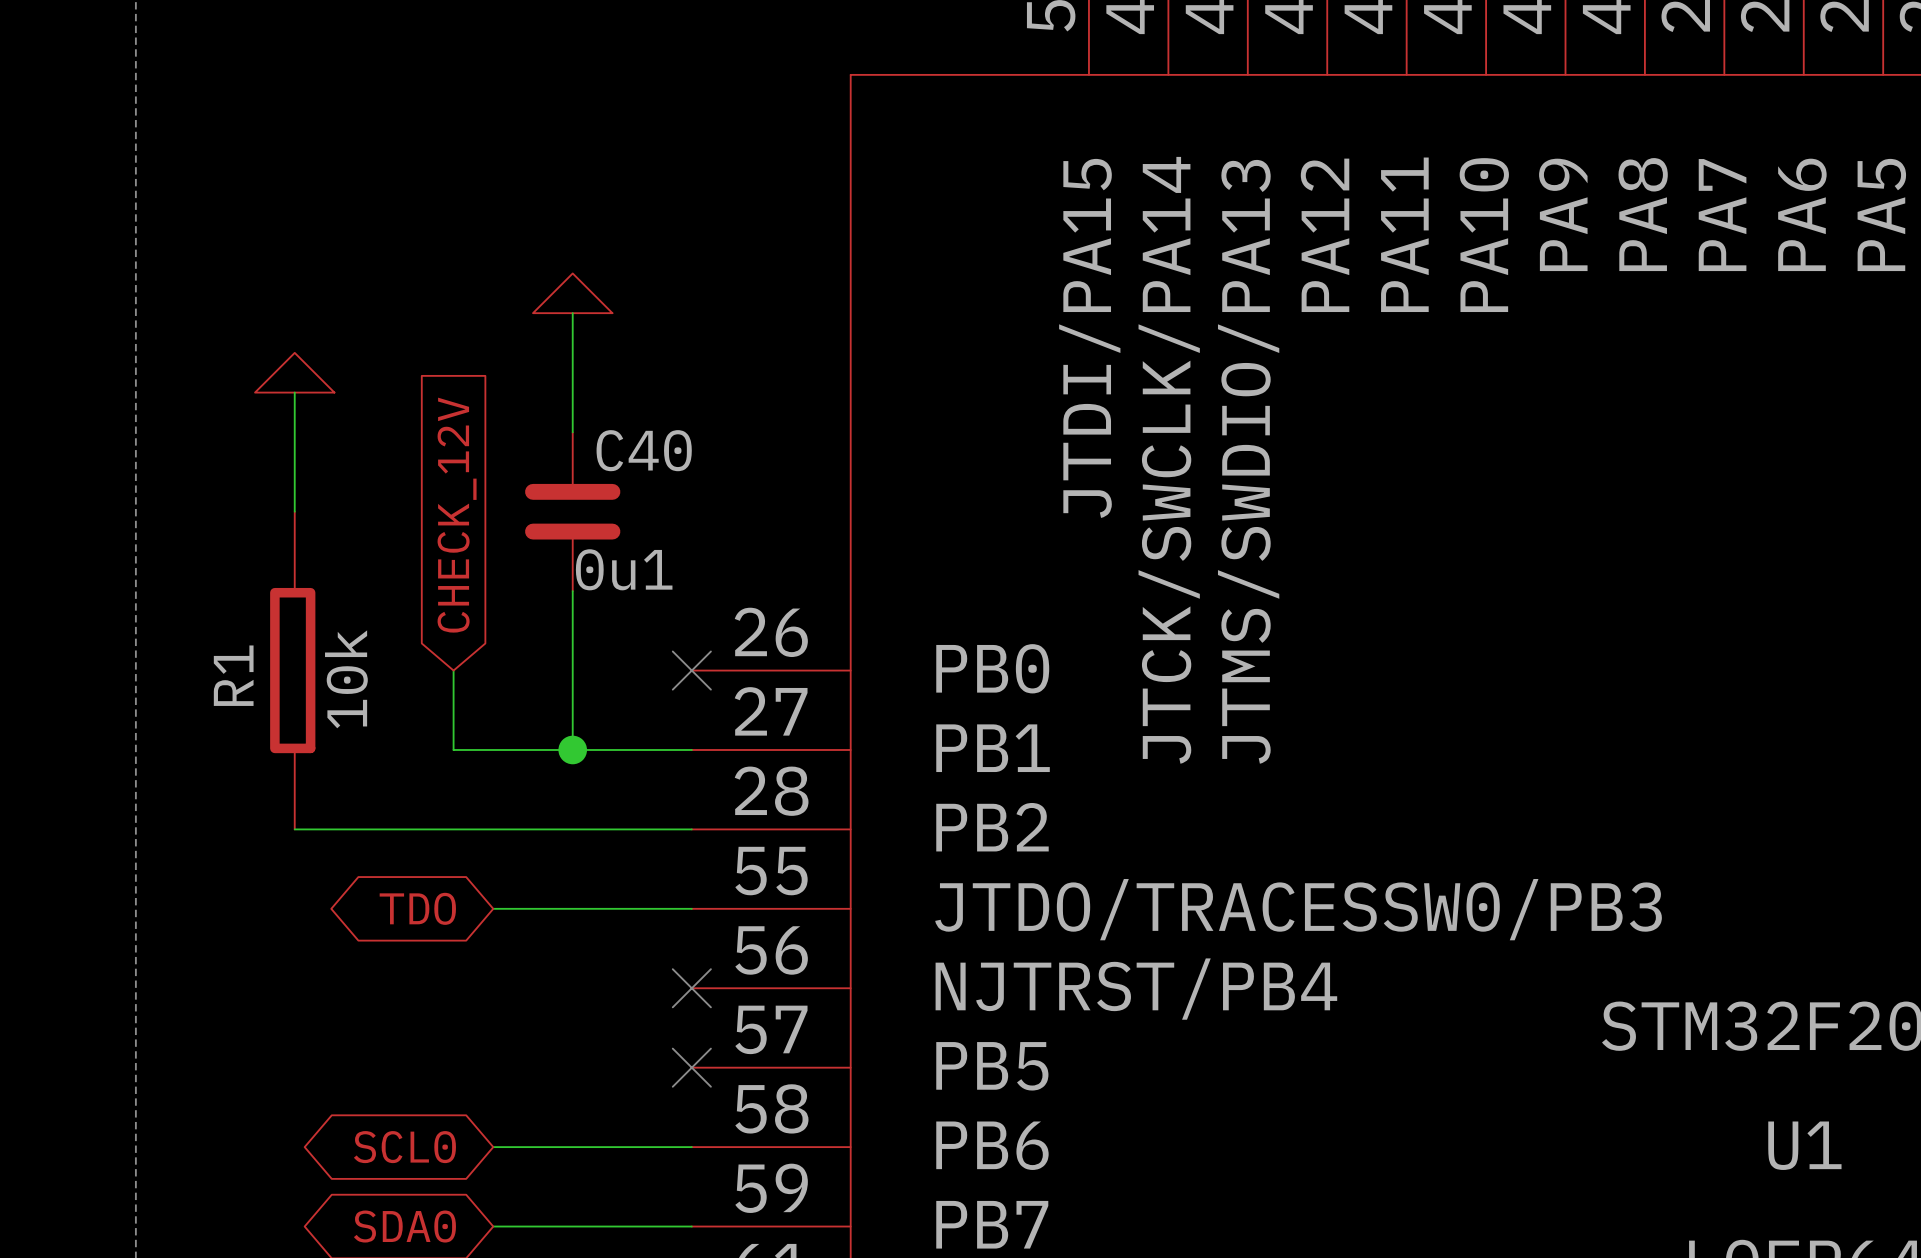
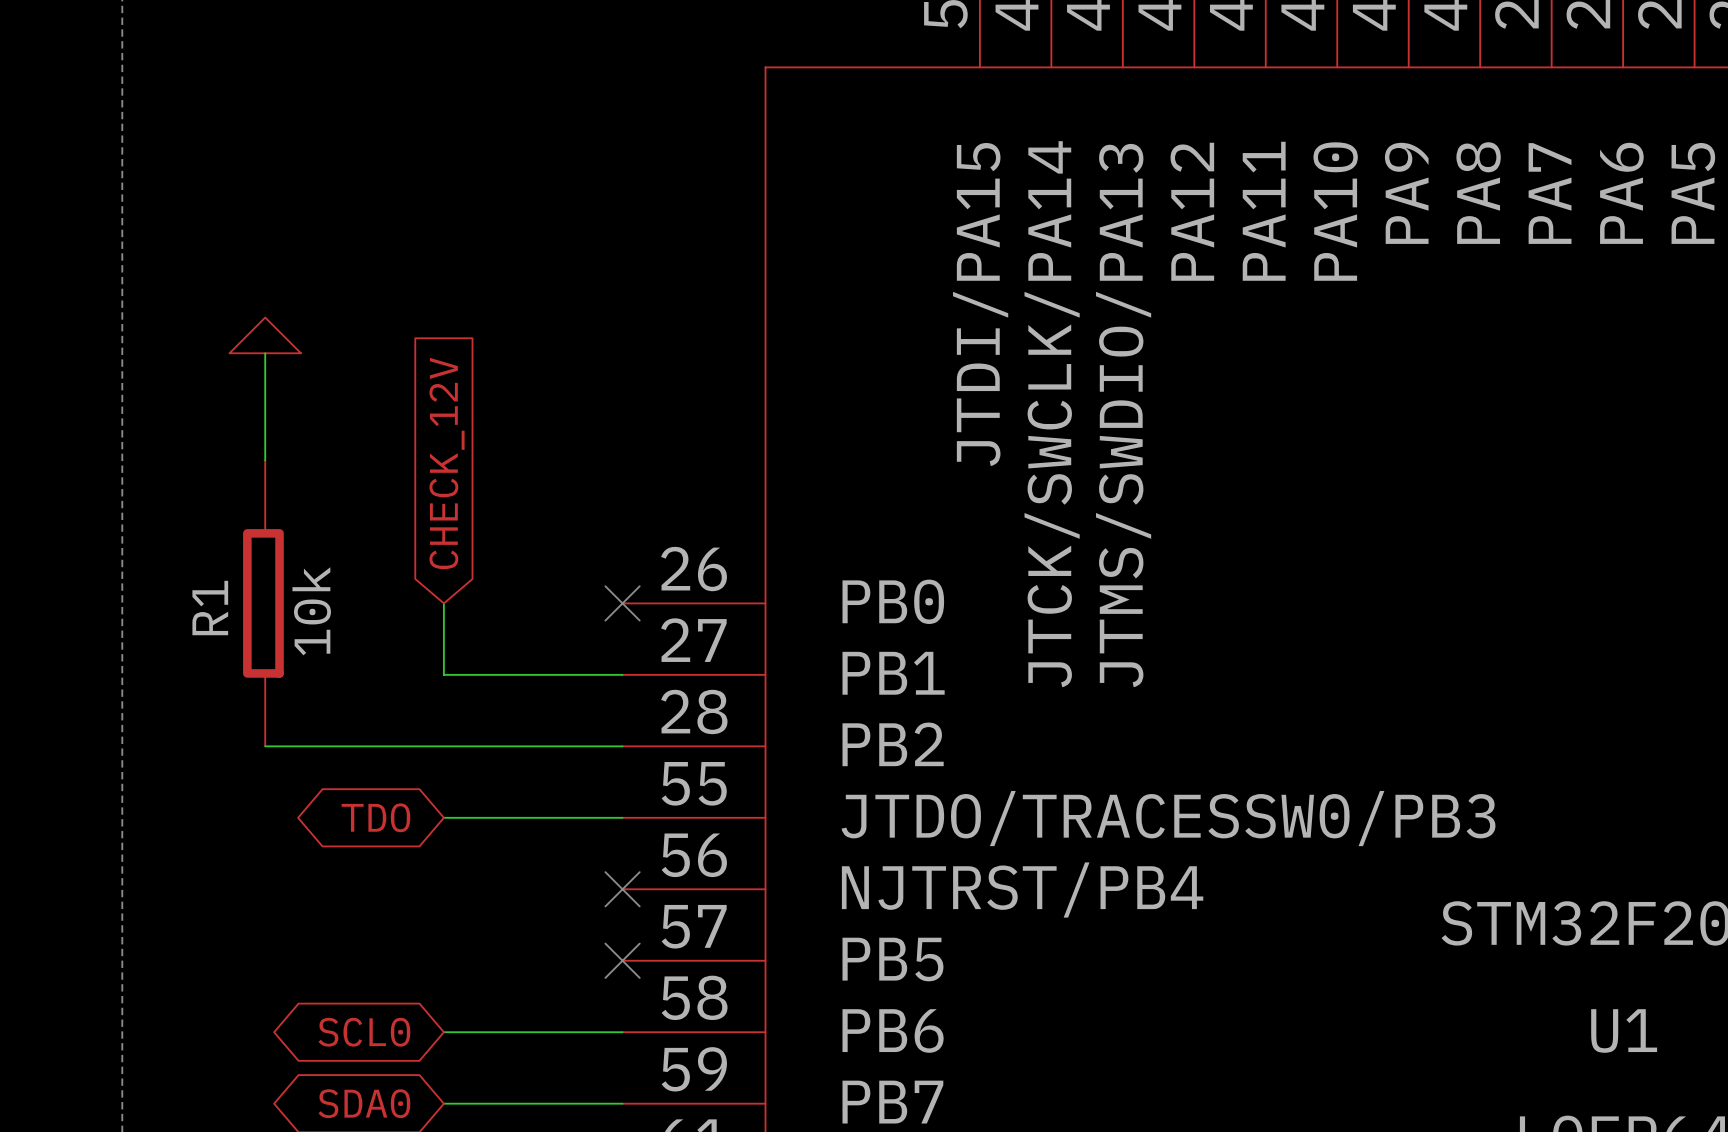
power symbol: (572, 293) -> none
wire: (572, 313) (572, 432) -> none
C40: 0u1 (572, 511) -> none
global label position: CHECK_12V (457, 515) -> CHECK_12V (447, 463)
wire: (572, 591) (572, 749) -> none
wire: (453, 670) (453, 749) (493, 749) -> (443, 603) (443, 674)
junction: (572, 749) -> none

